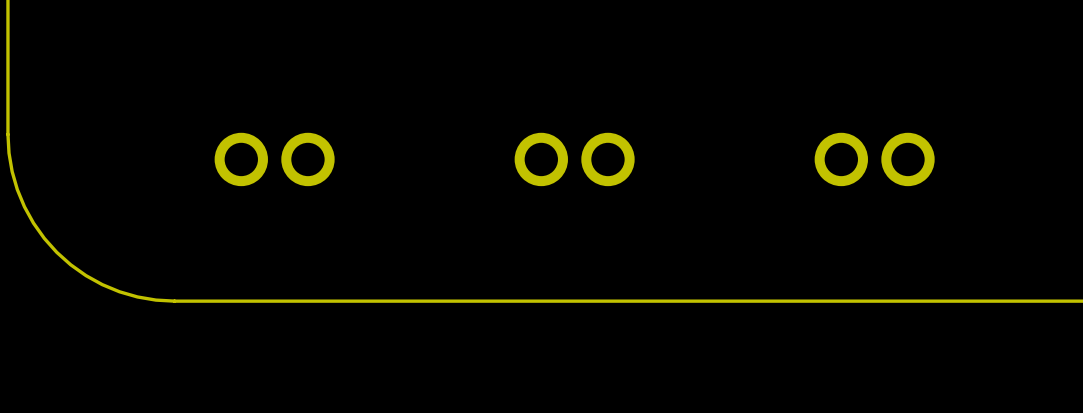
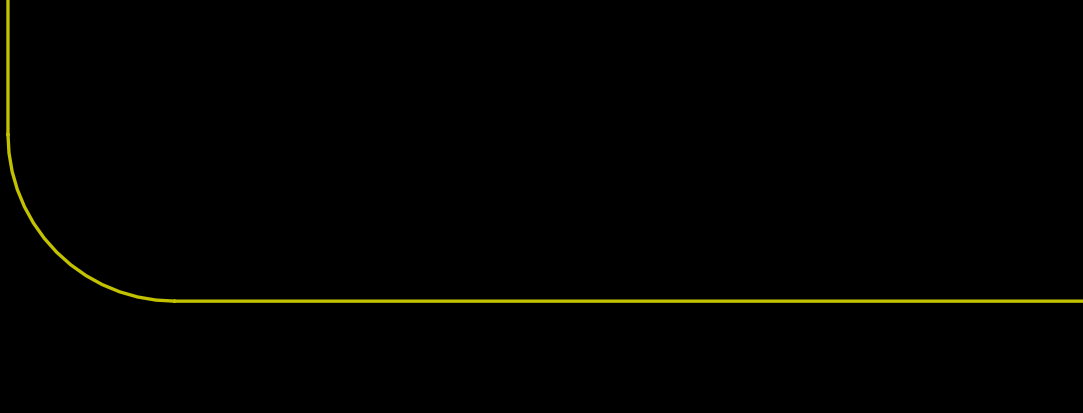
part: (274, 159) -> none
part: (574, 159) -> none
part: (874, 159) -> none

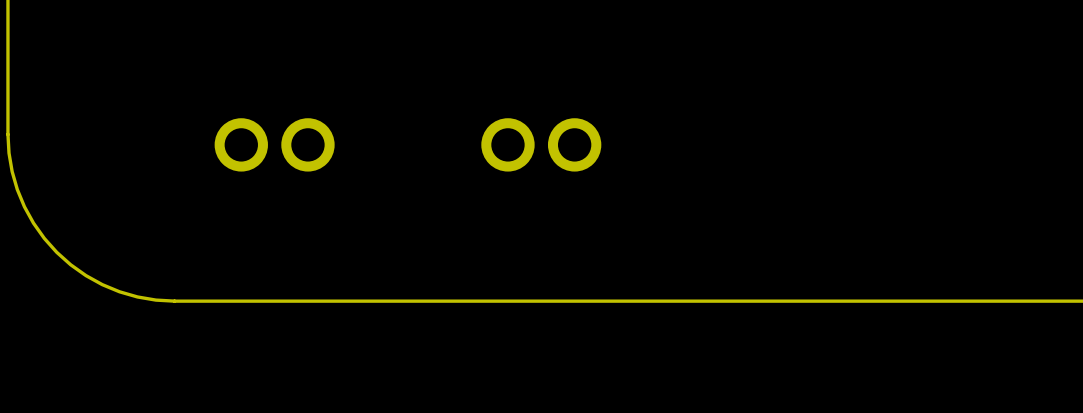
part: none -> (274, 144)
part: none -> (541, 144)

